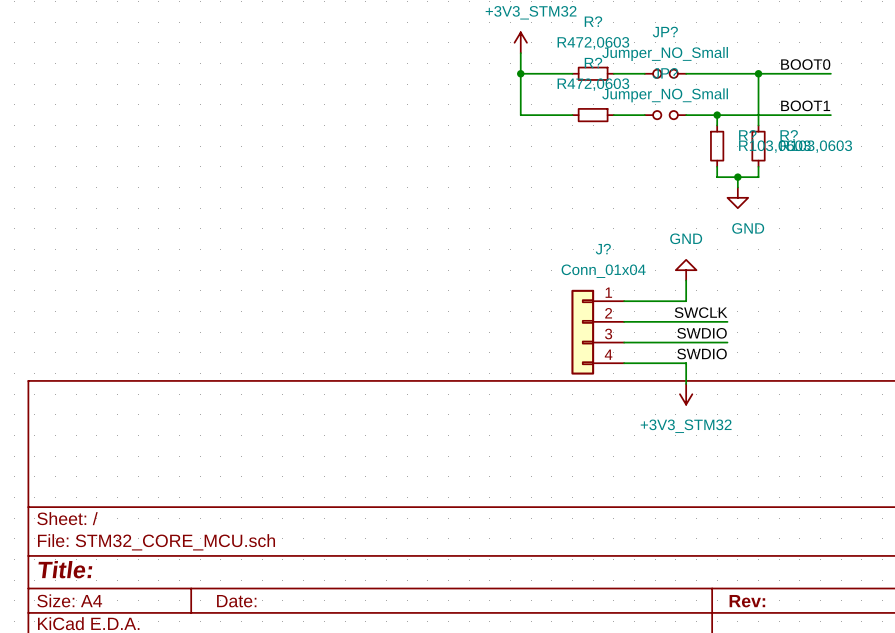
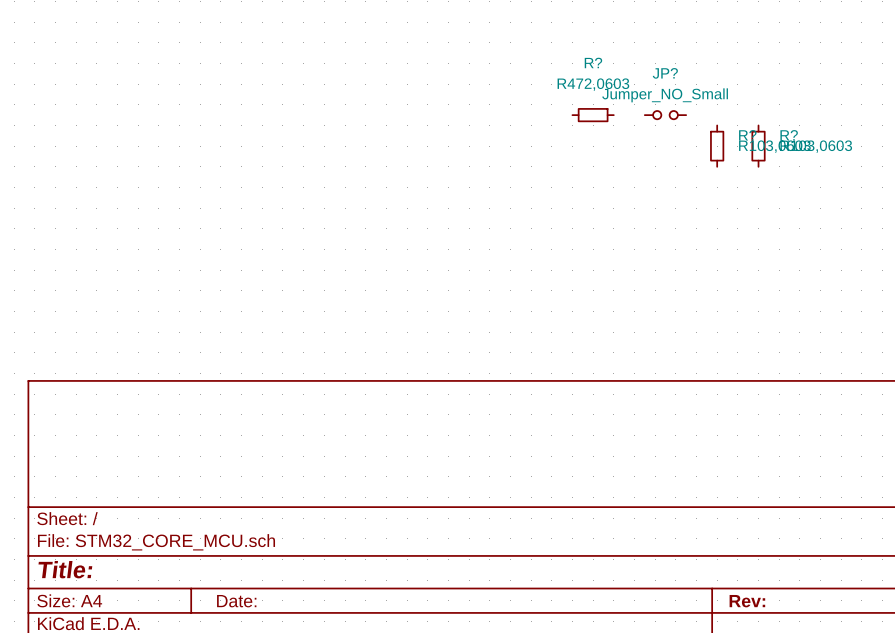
power symbol: +3V3_STM32 (520, 42) -> none
wire: (520, 53) (520, 115) (572, 115) -> none
label: BOOT0 (805, 64) -> none
wire: (520, 73) (572, 73) -> none
junction: (520, 73) -> none
R?: R472,0603 (593, 73) -> none
wire: (613, 73) (644, 73) -> none
JP?: Jumper_NO_Small (665, 73) -> none
wire: (686, 73) (830, 73) -> none
wire: (758, 73) (758, 125) -> none
junction: (758, 73) -> none
label: BOOT1 (805, 105) -> none
wire: (613, 115) (644, 115) -> none
wire: (686, 115) (830, 115) -> none
wire: (717, 115) (717, 125) -> none
junction: (717, 115) -> none
wire: (717, 166) (717, 177) (758, 177) (758, 166) -> none
wire: (737, 177) (737, 187) -> none
junction: (737, 177) -> none
power symbol: GND (737, 197) -> none
power symbol: GND (686, 270) -> none
wire: (686, 280) (686, 301) (624, 301) -> none
label: SWCLK (701, 312) -> none
wire: (624, 321) (727, 321) -> none
J?: Conn_01x04 (597, 332) -> none
label: SWDIO (702, 333) -> none
wire: (624, 342) (727, 342) -> none
label: SWDIO (702, 353) -> none
wire: (624, 363) (686, 363) (686, 383) -> none
power symbol: +3V3_STM32 (686, 394) -> none

